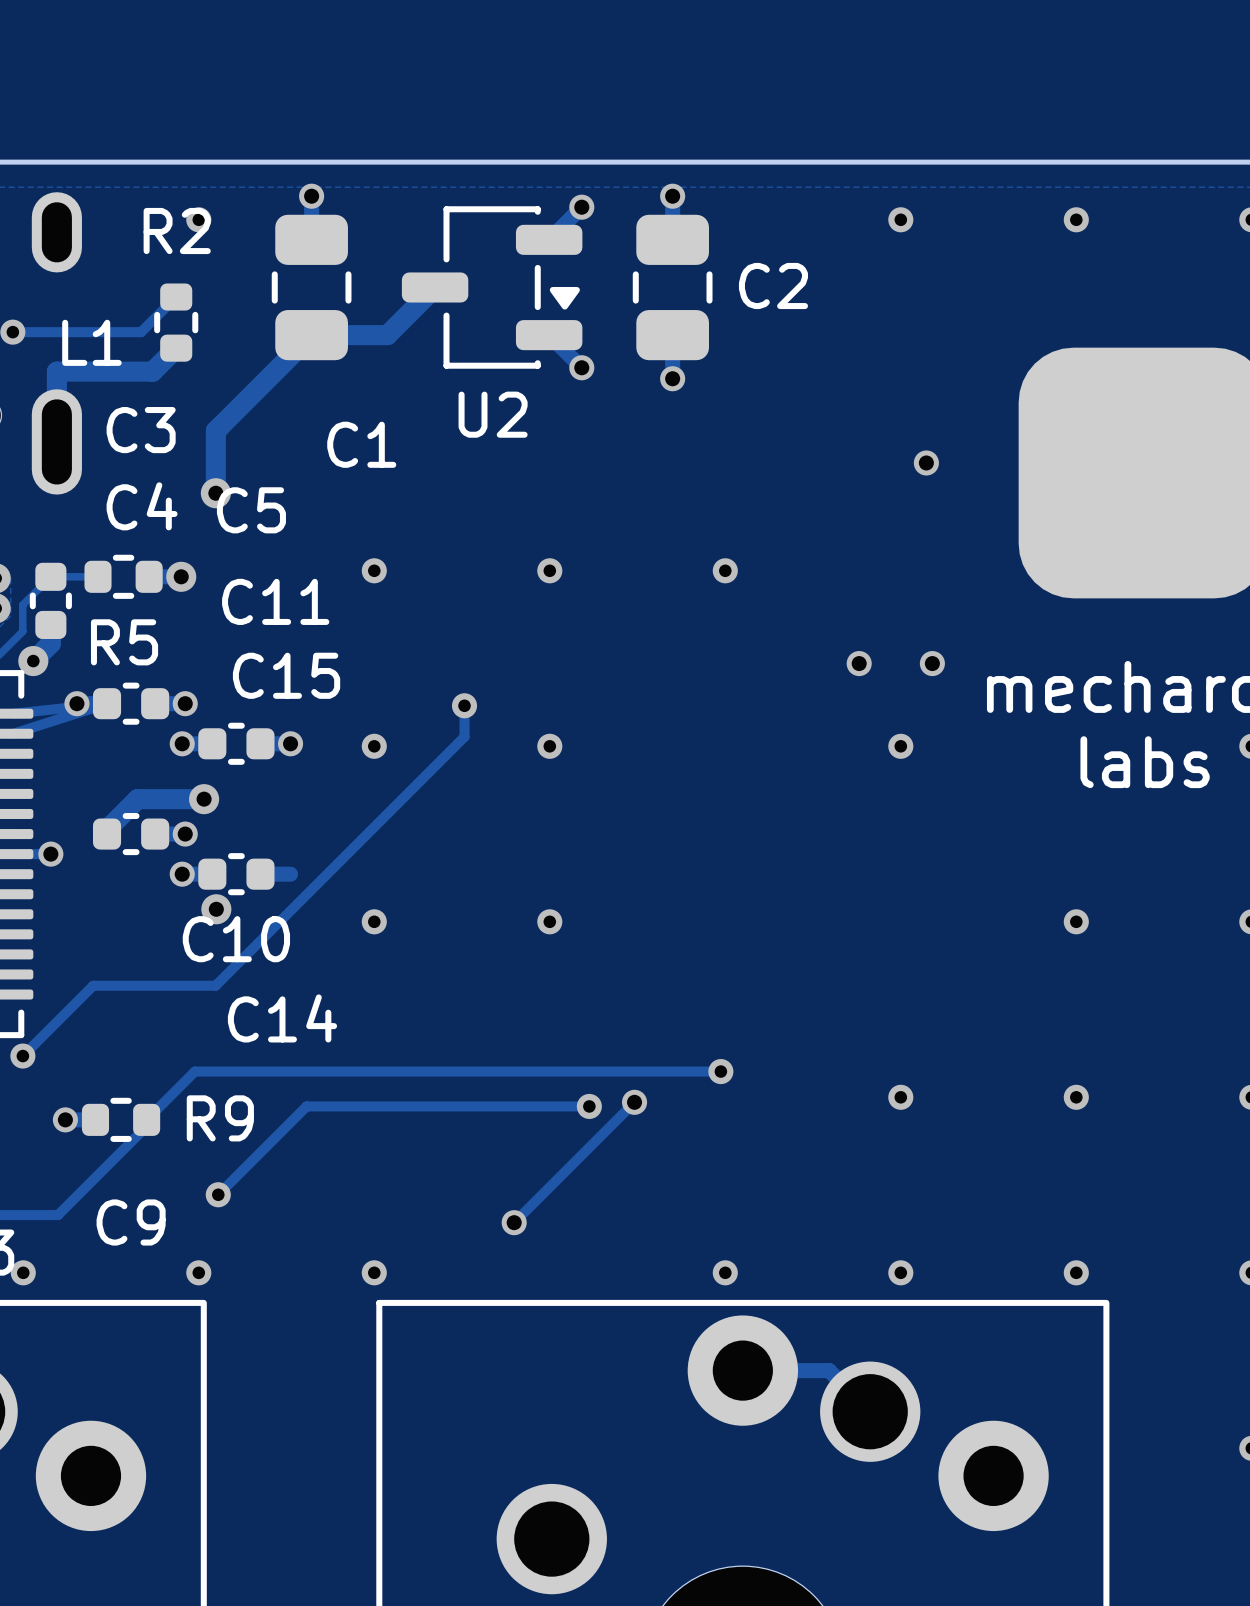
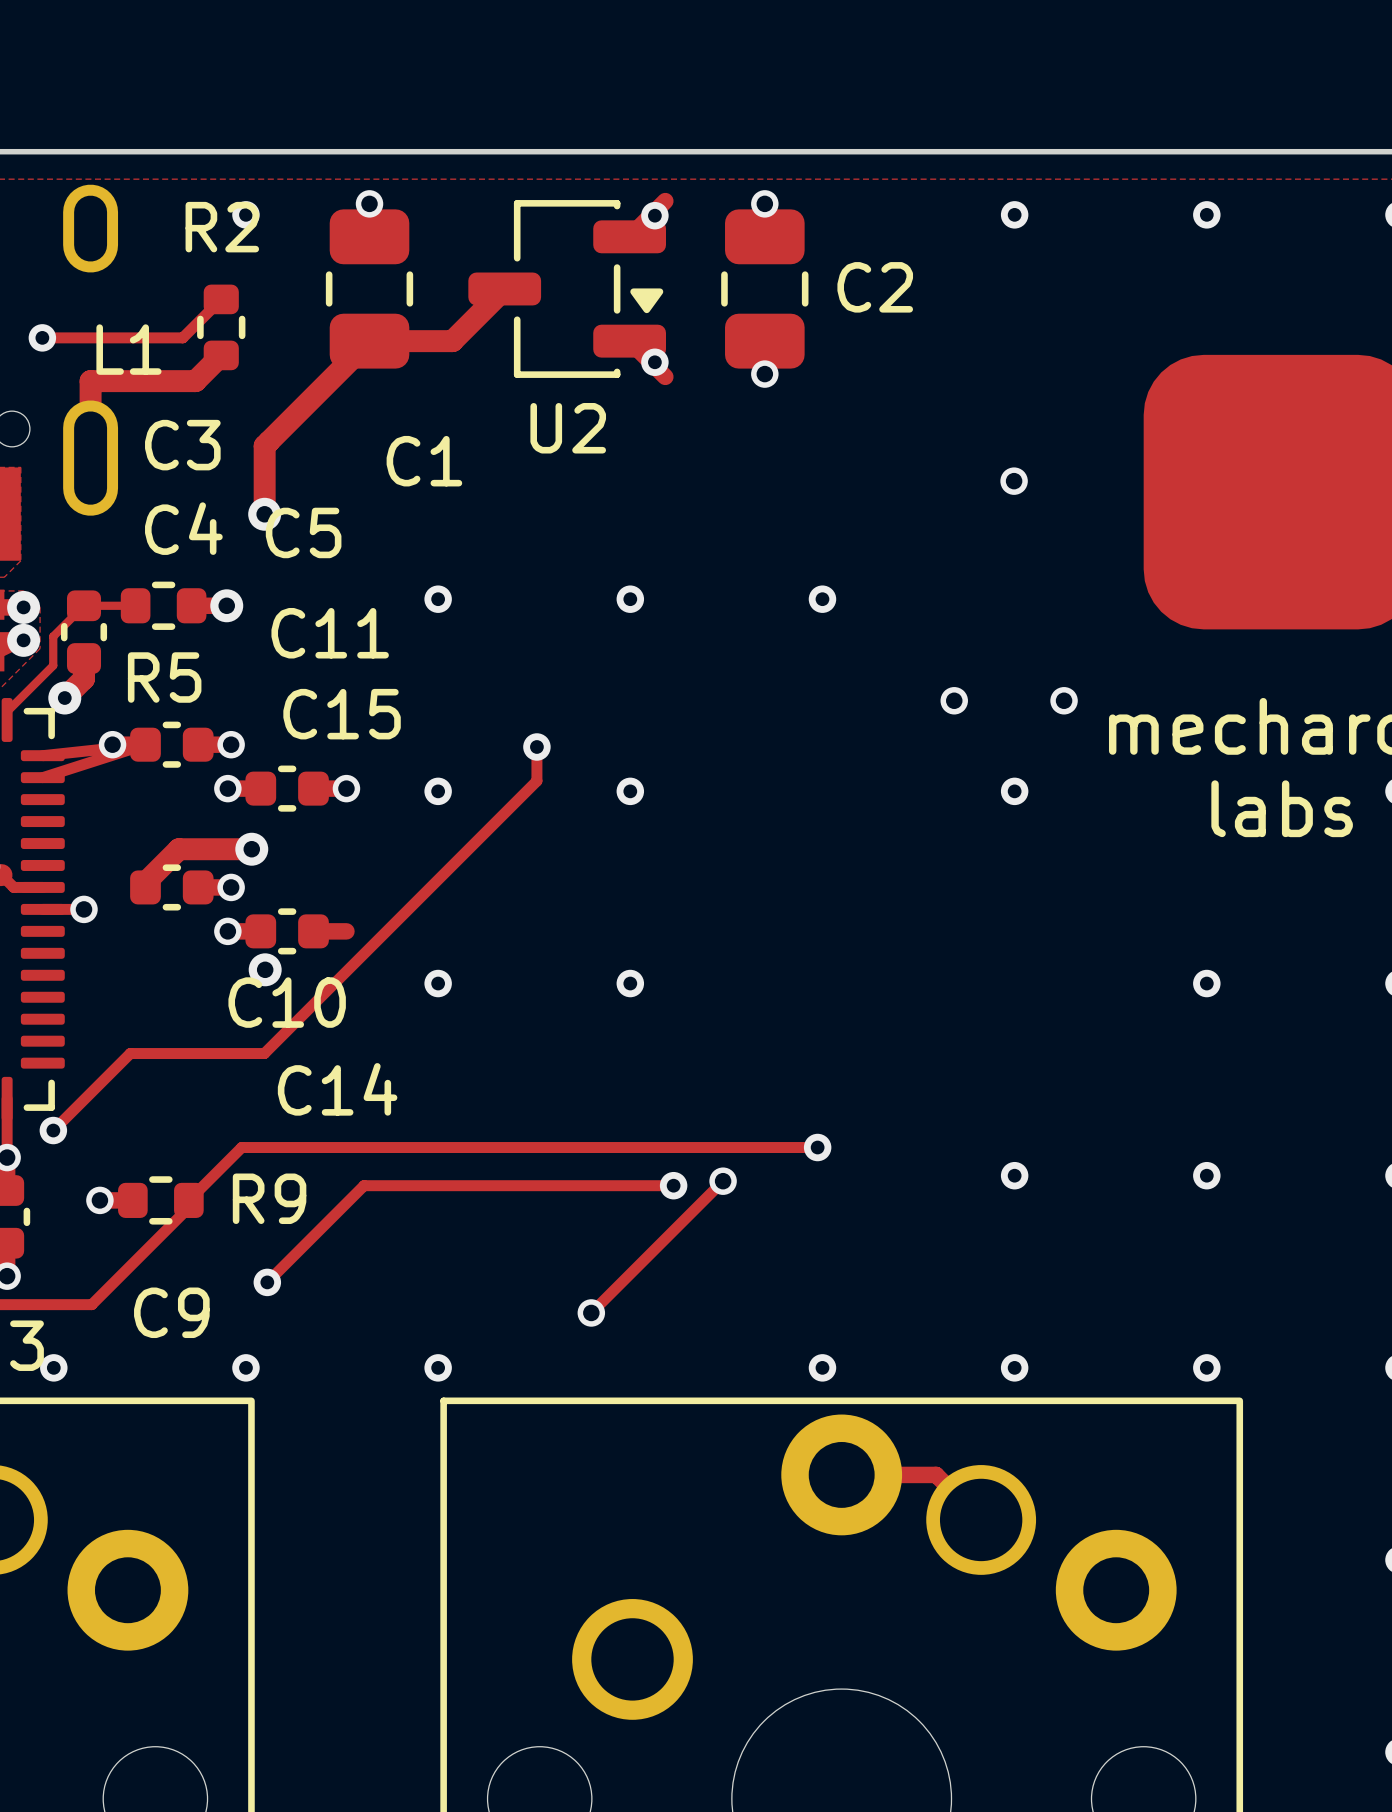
via position: (311, 196) -> (369, 203)
via position: (672, 196) -> (764, 203)
via position: (581, 207) -> (654, 215)
via position: (581, 367) -> (654, 362)
via position: (672, 378) -> (764, 374)
via position: (926, 462) -> (1014, 481)
via position: (859, 663) -> (954, 700)
via position: (932, 663) -> (1064, 700)

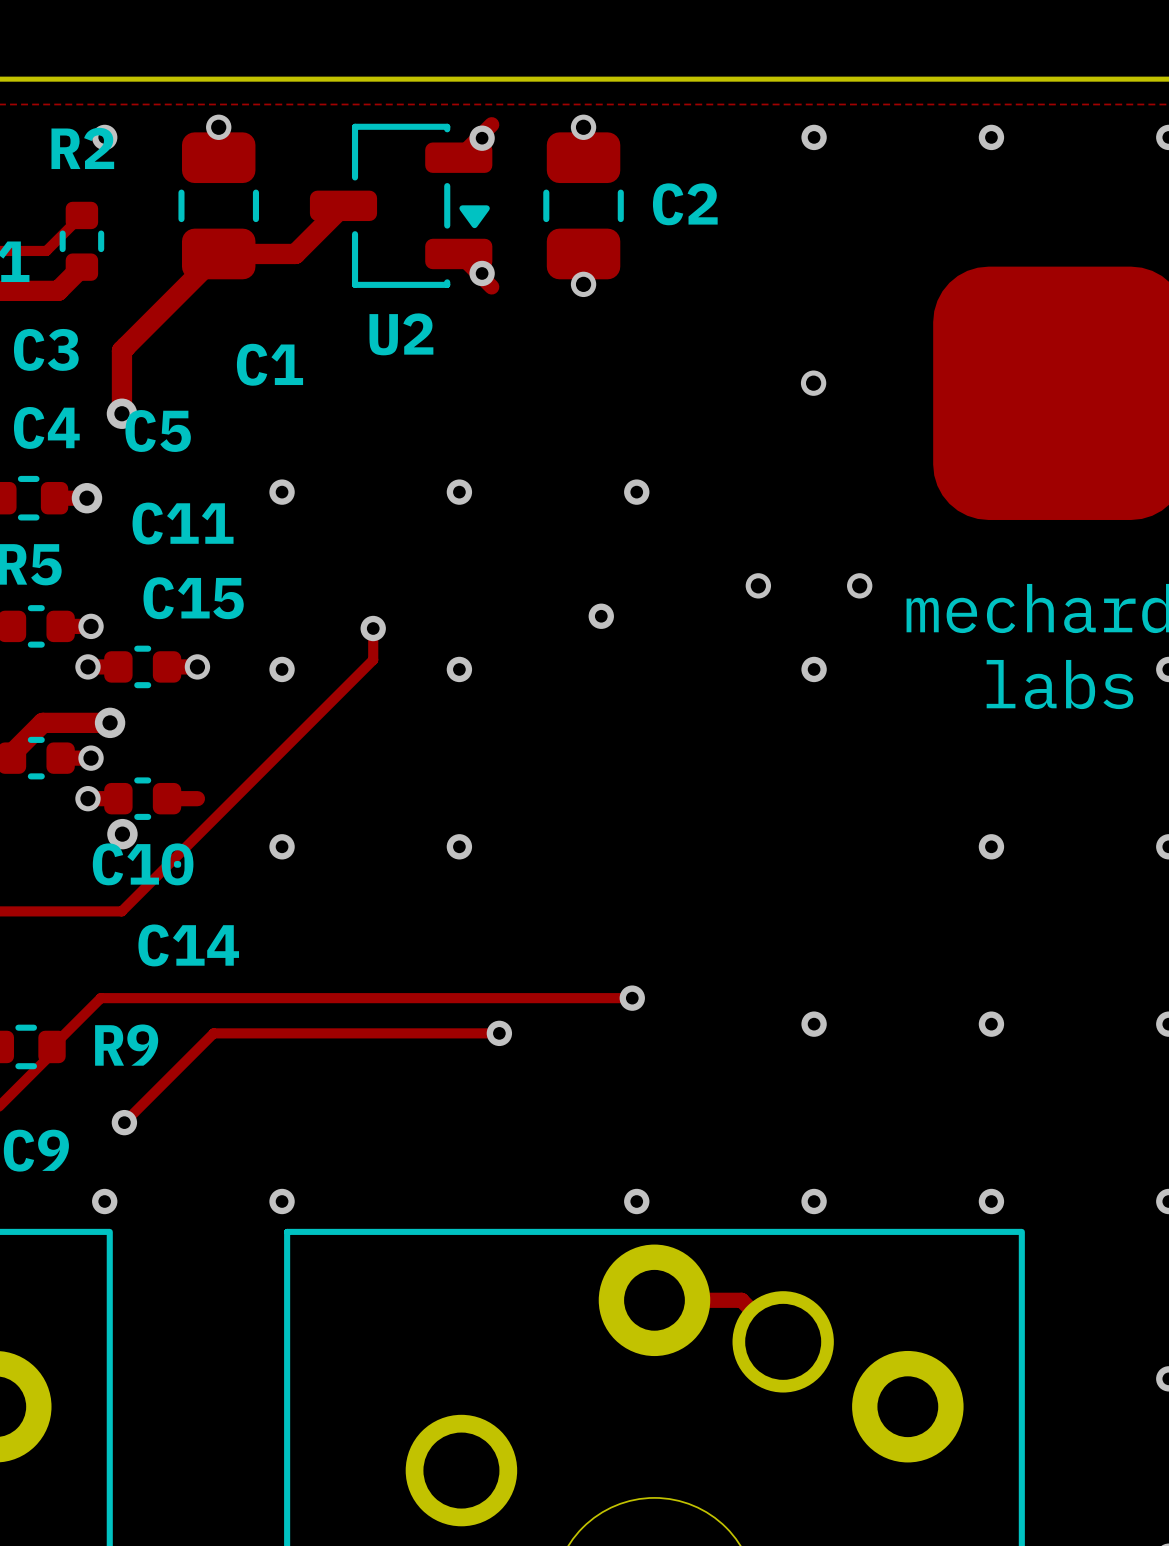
via: none -> (601, 616)
track: (723, 1181) (591, 1312) -> none
via: (723, 1181) -> none
via: (591, 1312) -> none

